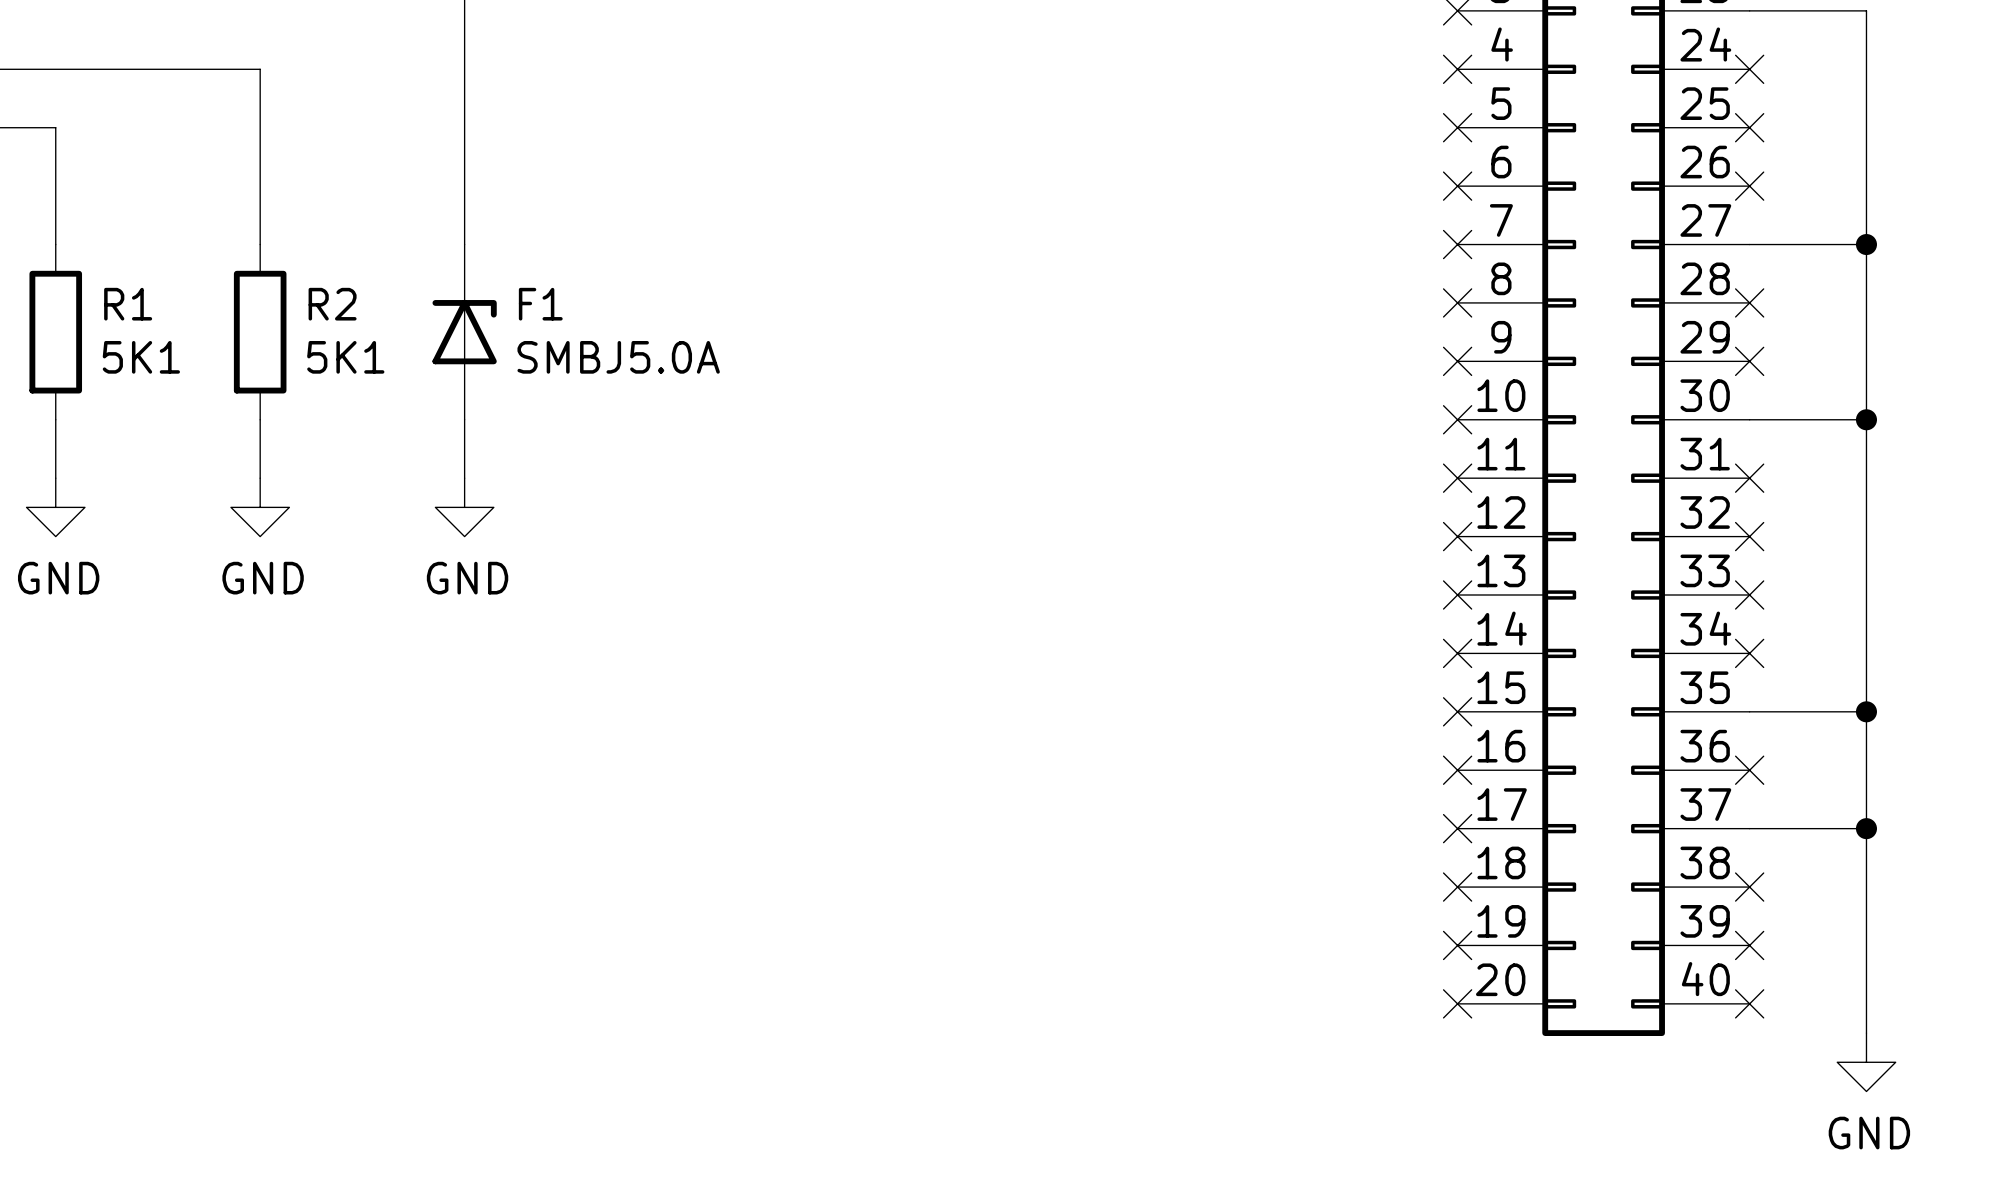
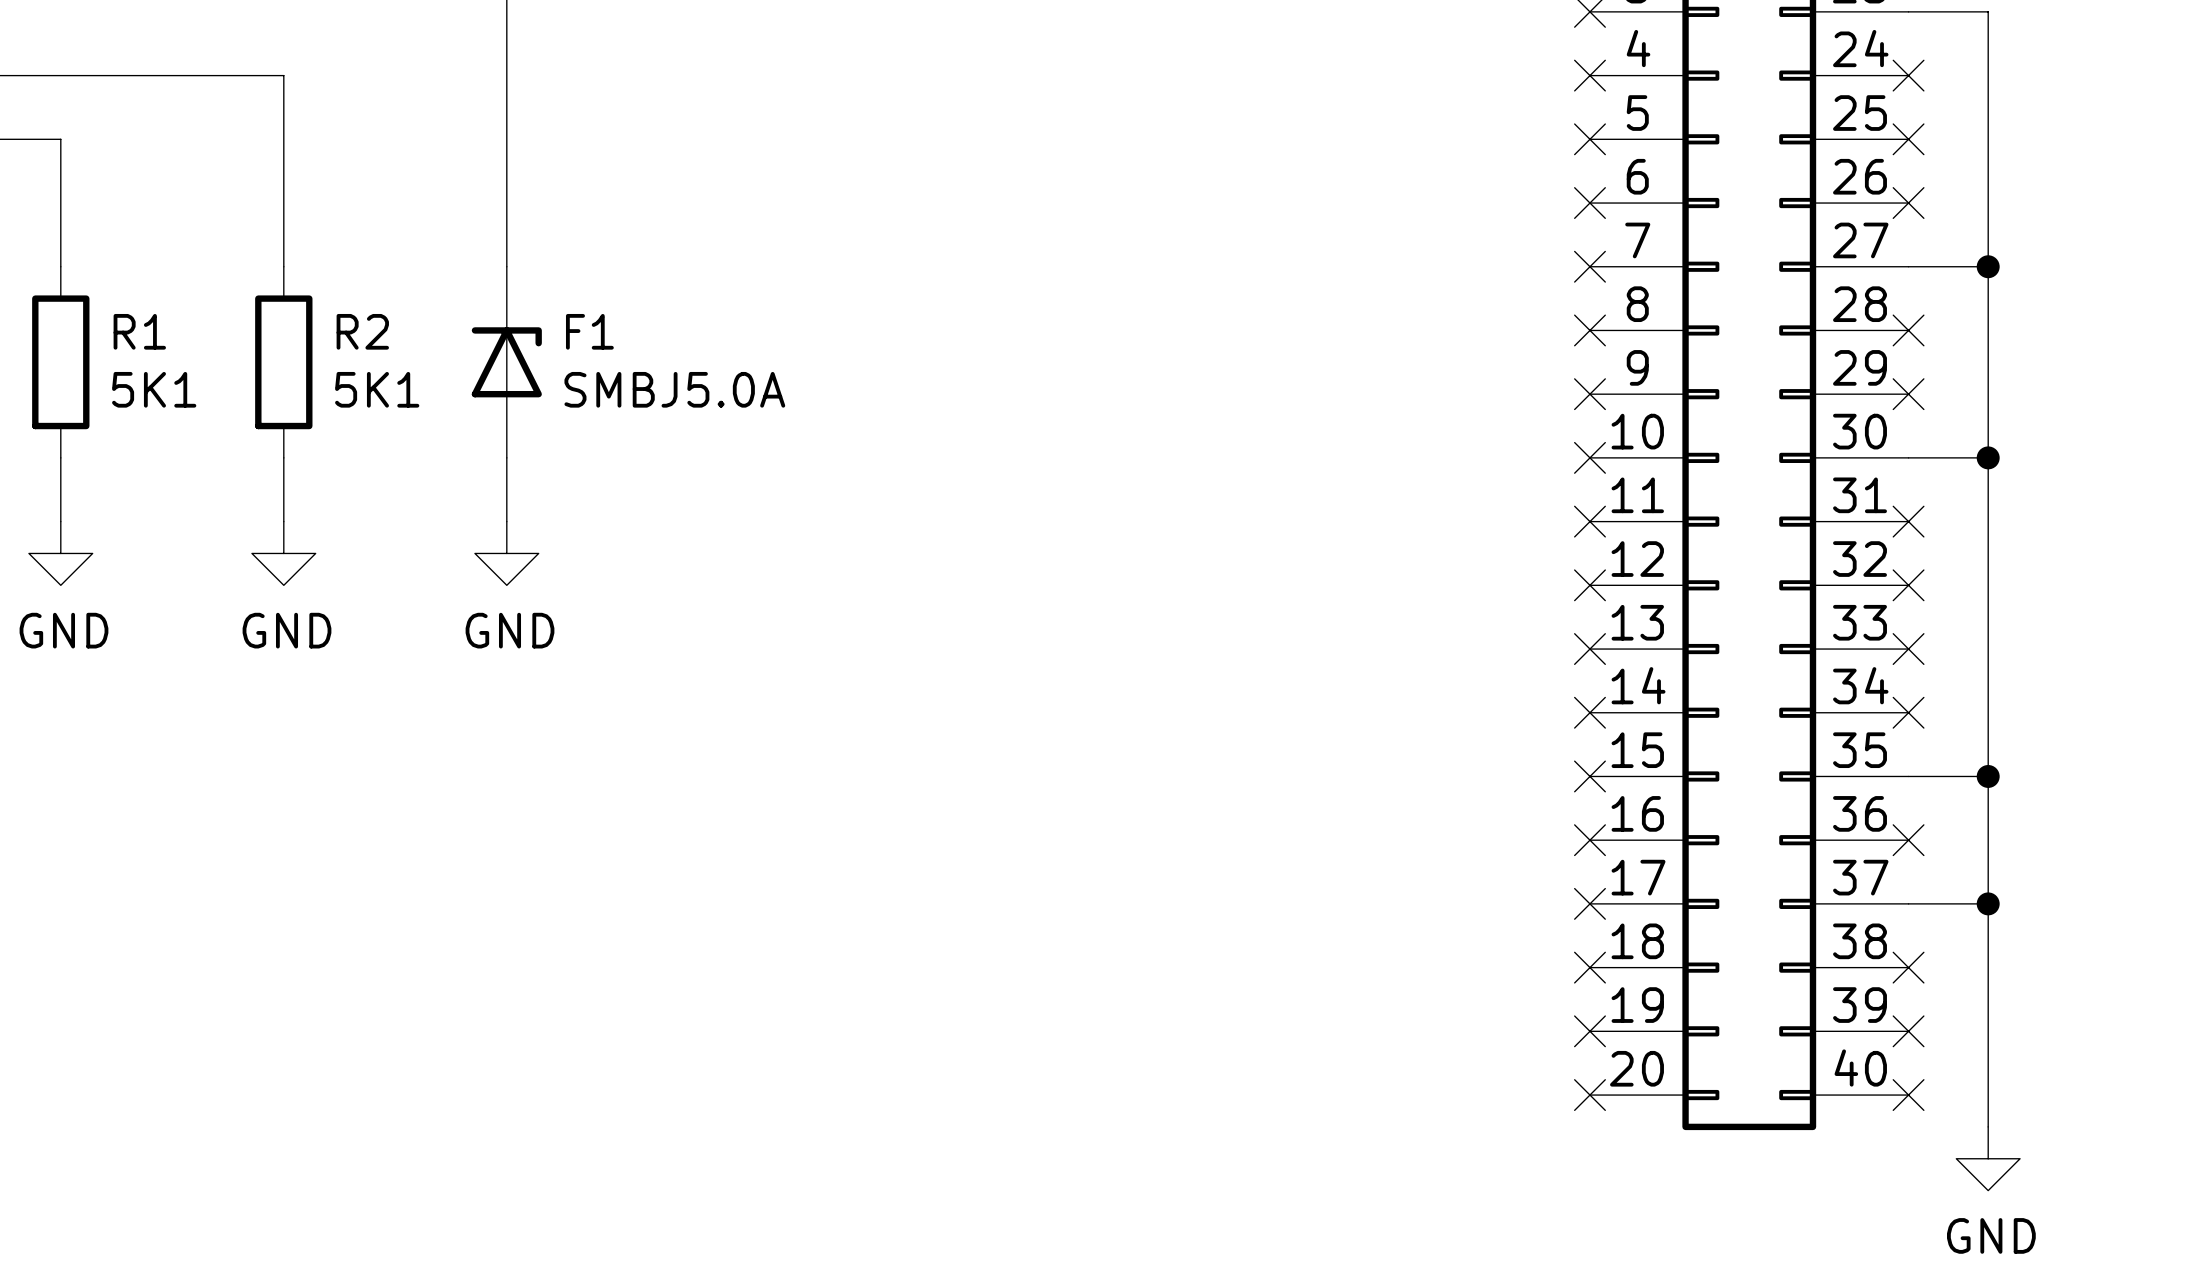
wire: (1822, 10) (1866, 10) (1866, 1033) -> (1988, 11) (1988, 1126)
wire: (1822, 244) (1866, 244) -> none
junction position: (1866, 244) -> (1988, 266)
wire: (1822, 419) (1866, 419) -> none
junction position: (1866, 419) -> (1988, 457)
wire: (1822, 711) (1866, 711) -> none
junction position: (1866, 711) -> (1988, 776)
wire: (1822, 828) (1866, 828) -> none
junction position: (1866, 828) -> (1988, 903)
power symbol position: GND (1866, 1062) -> GND (1988, 1158)

